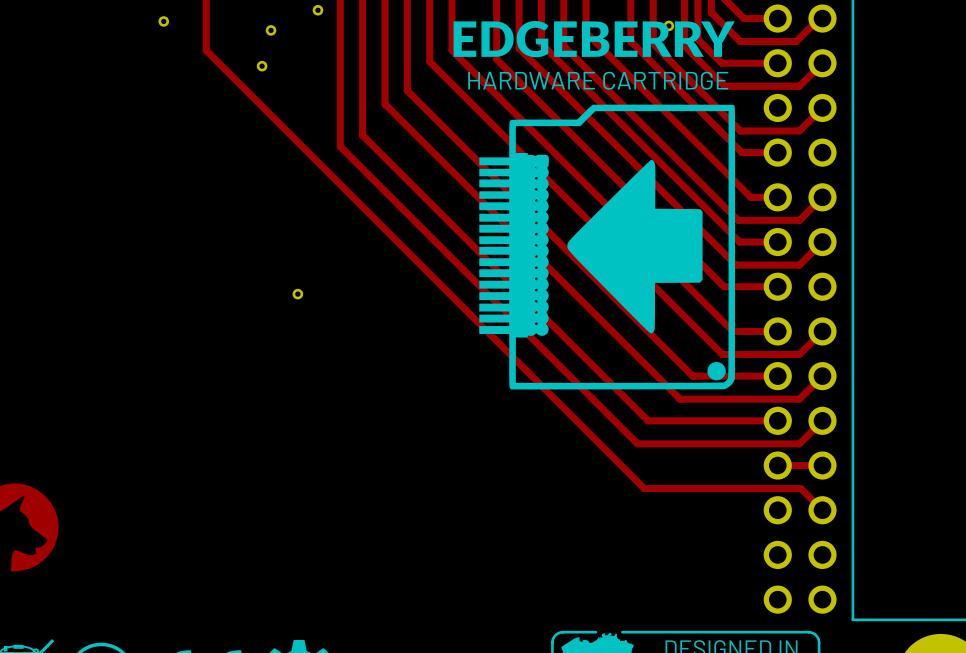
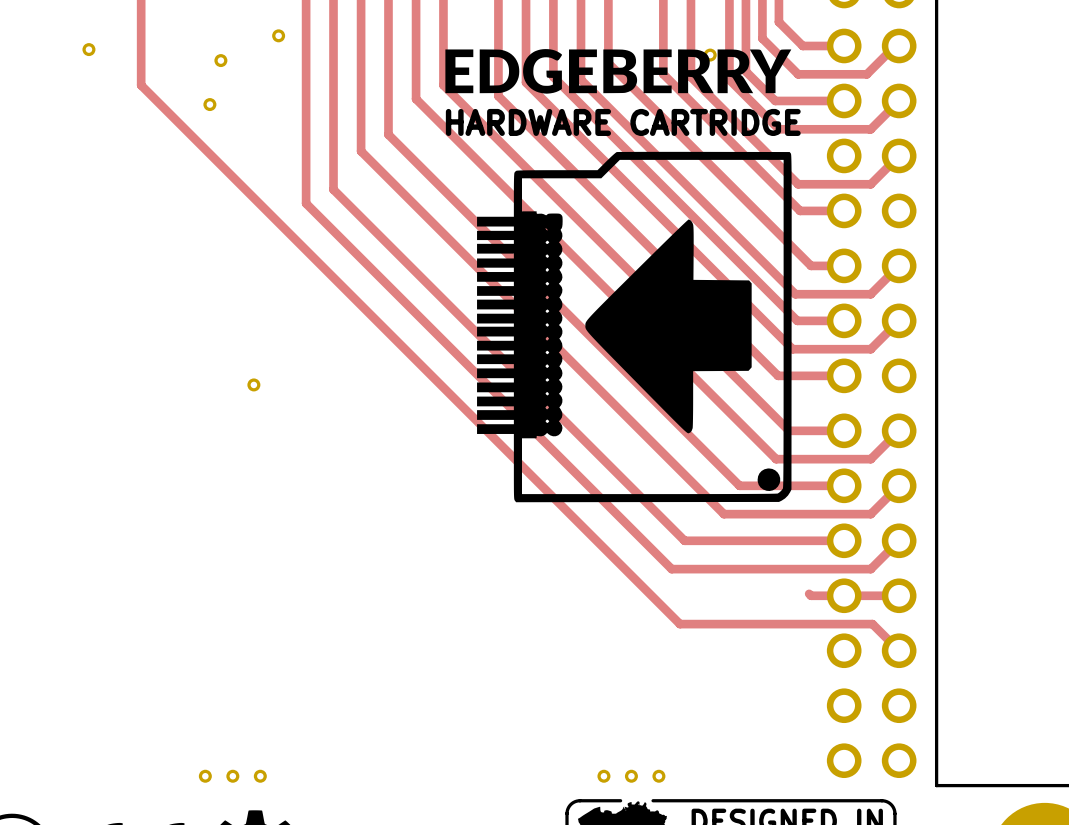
track: none -> (809, 593) (811, 595) (844, 595)
part: none -> (205, 776)
part: none -> (232, 776)
part: none -> (260, 776)
part: none -> (603, 776)
part: none -> (631, 776)
part: none -> (658, 776)

